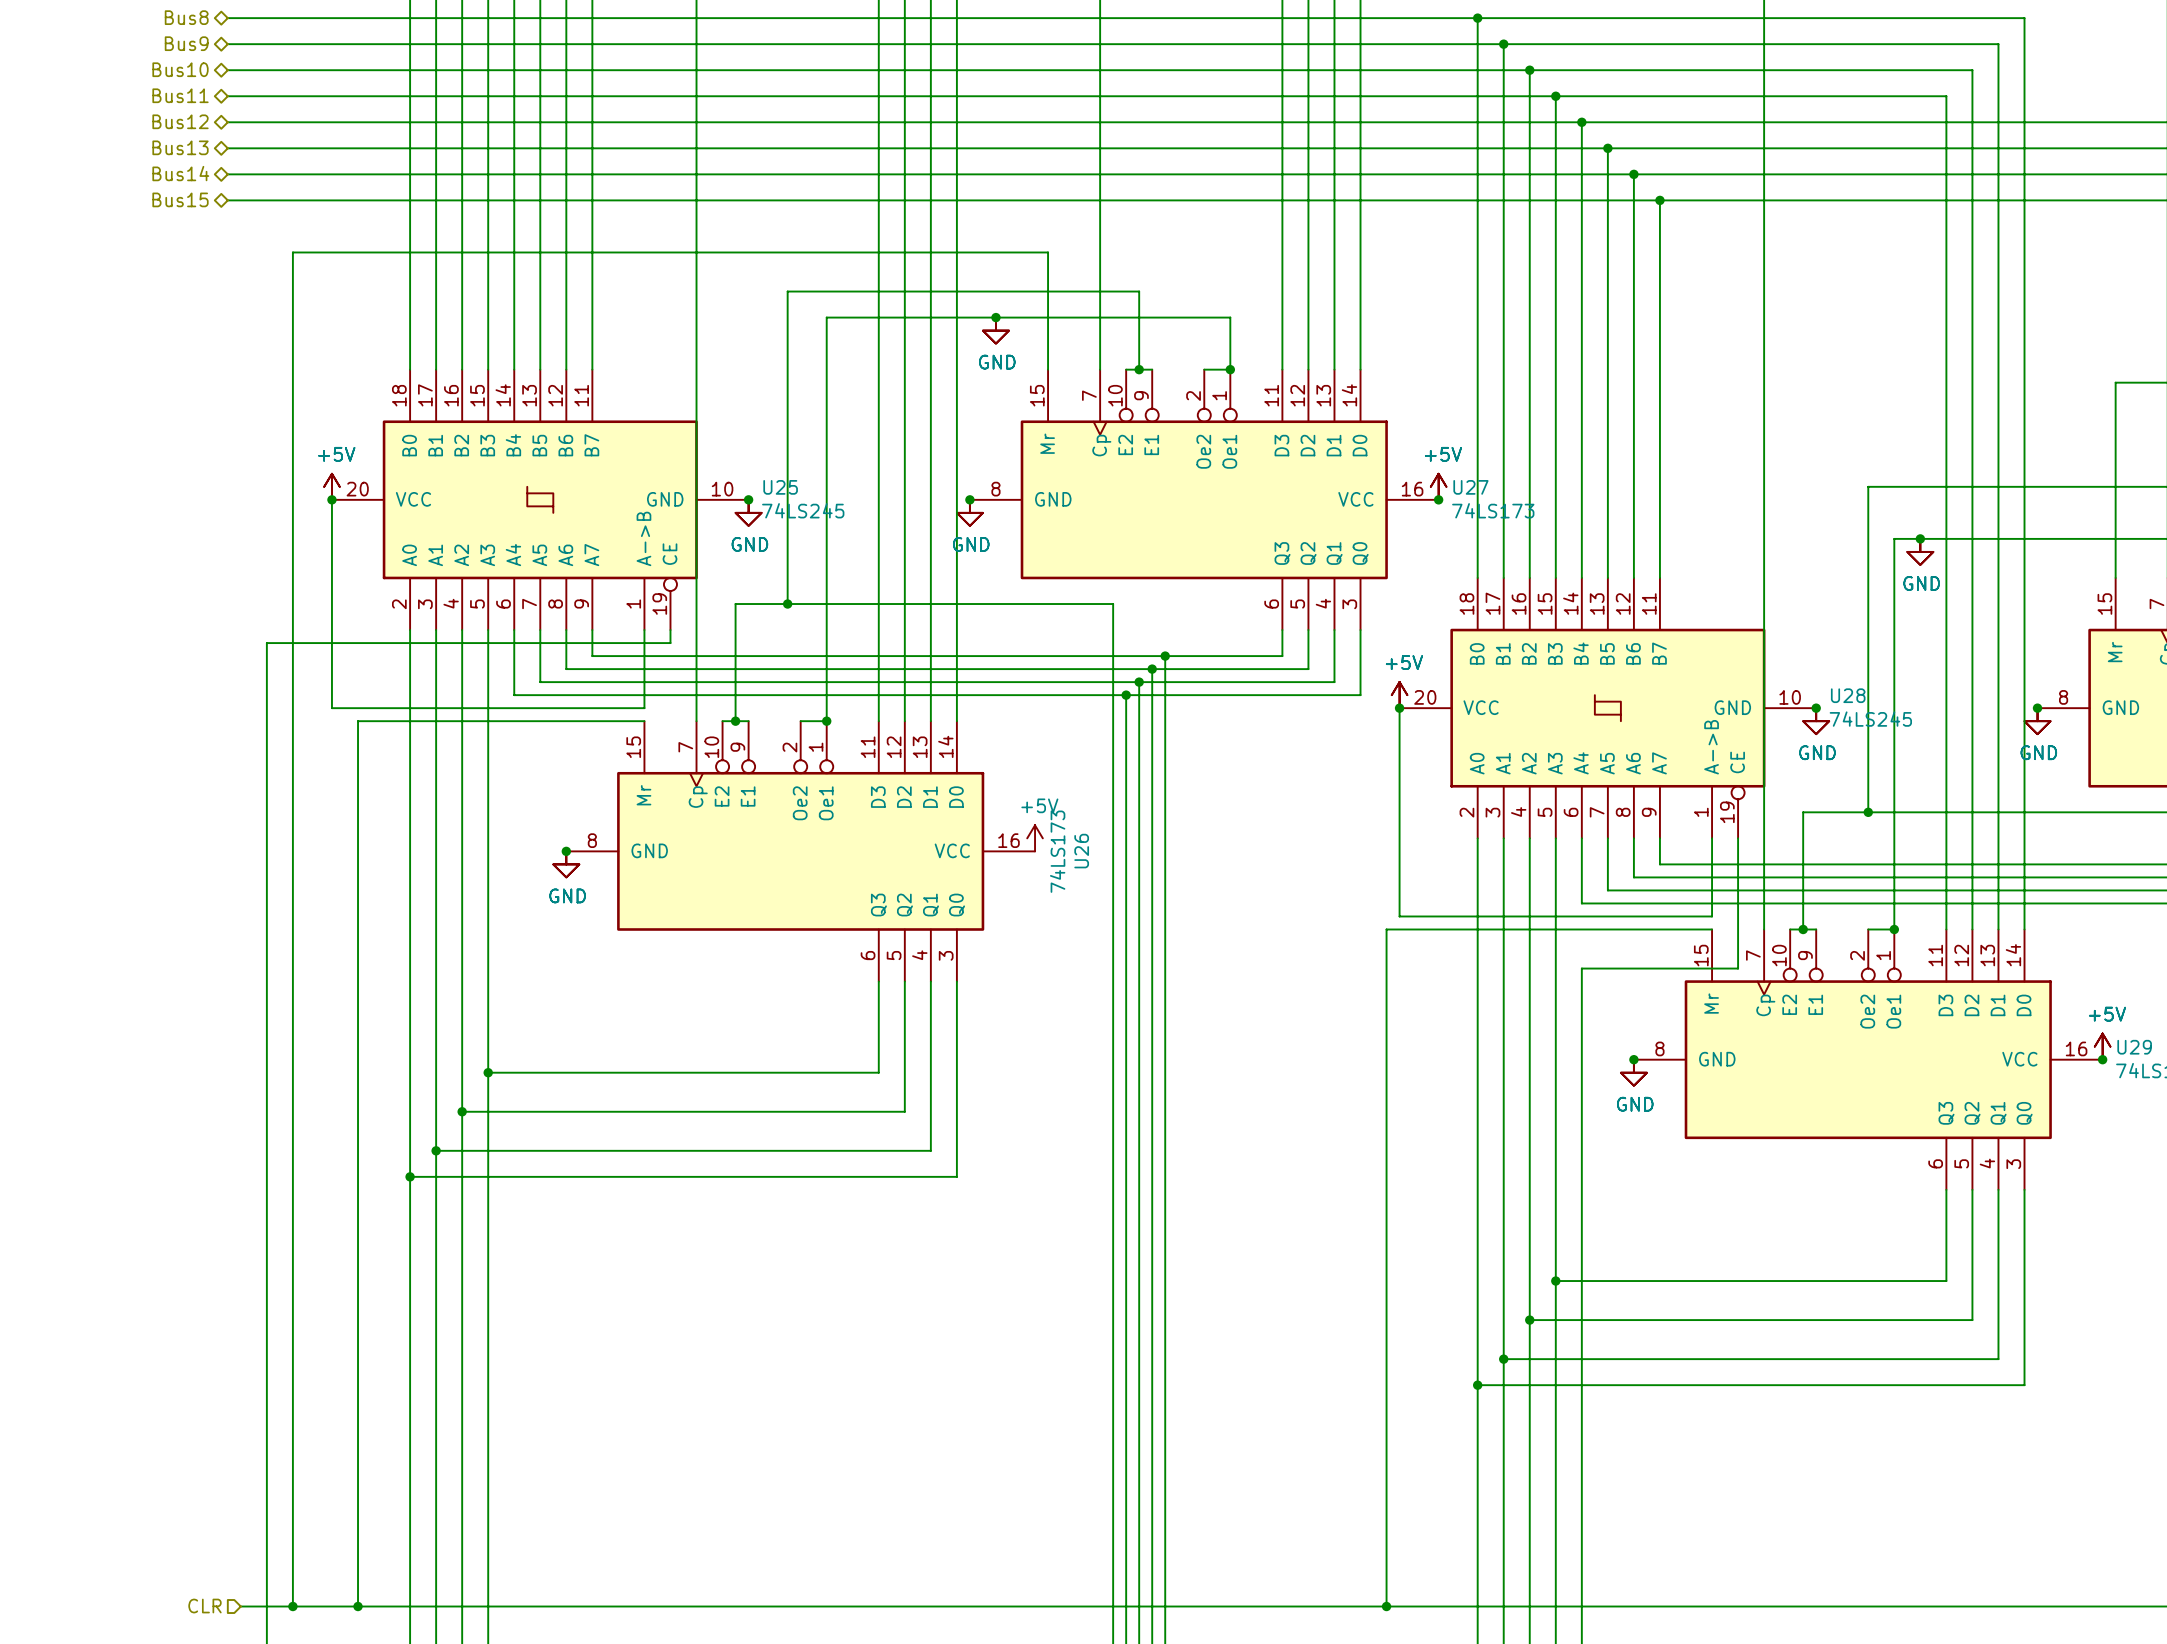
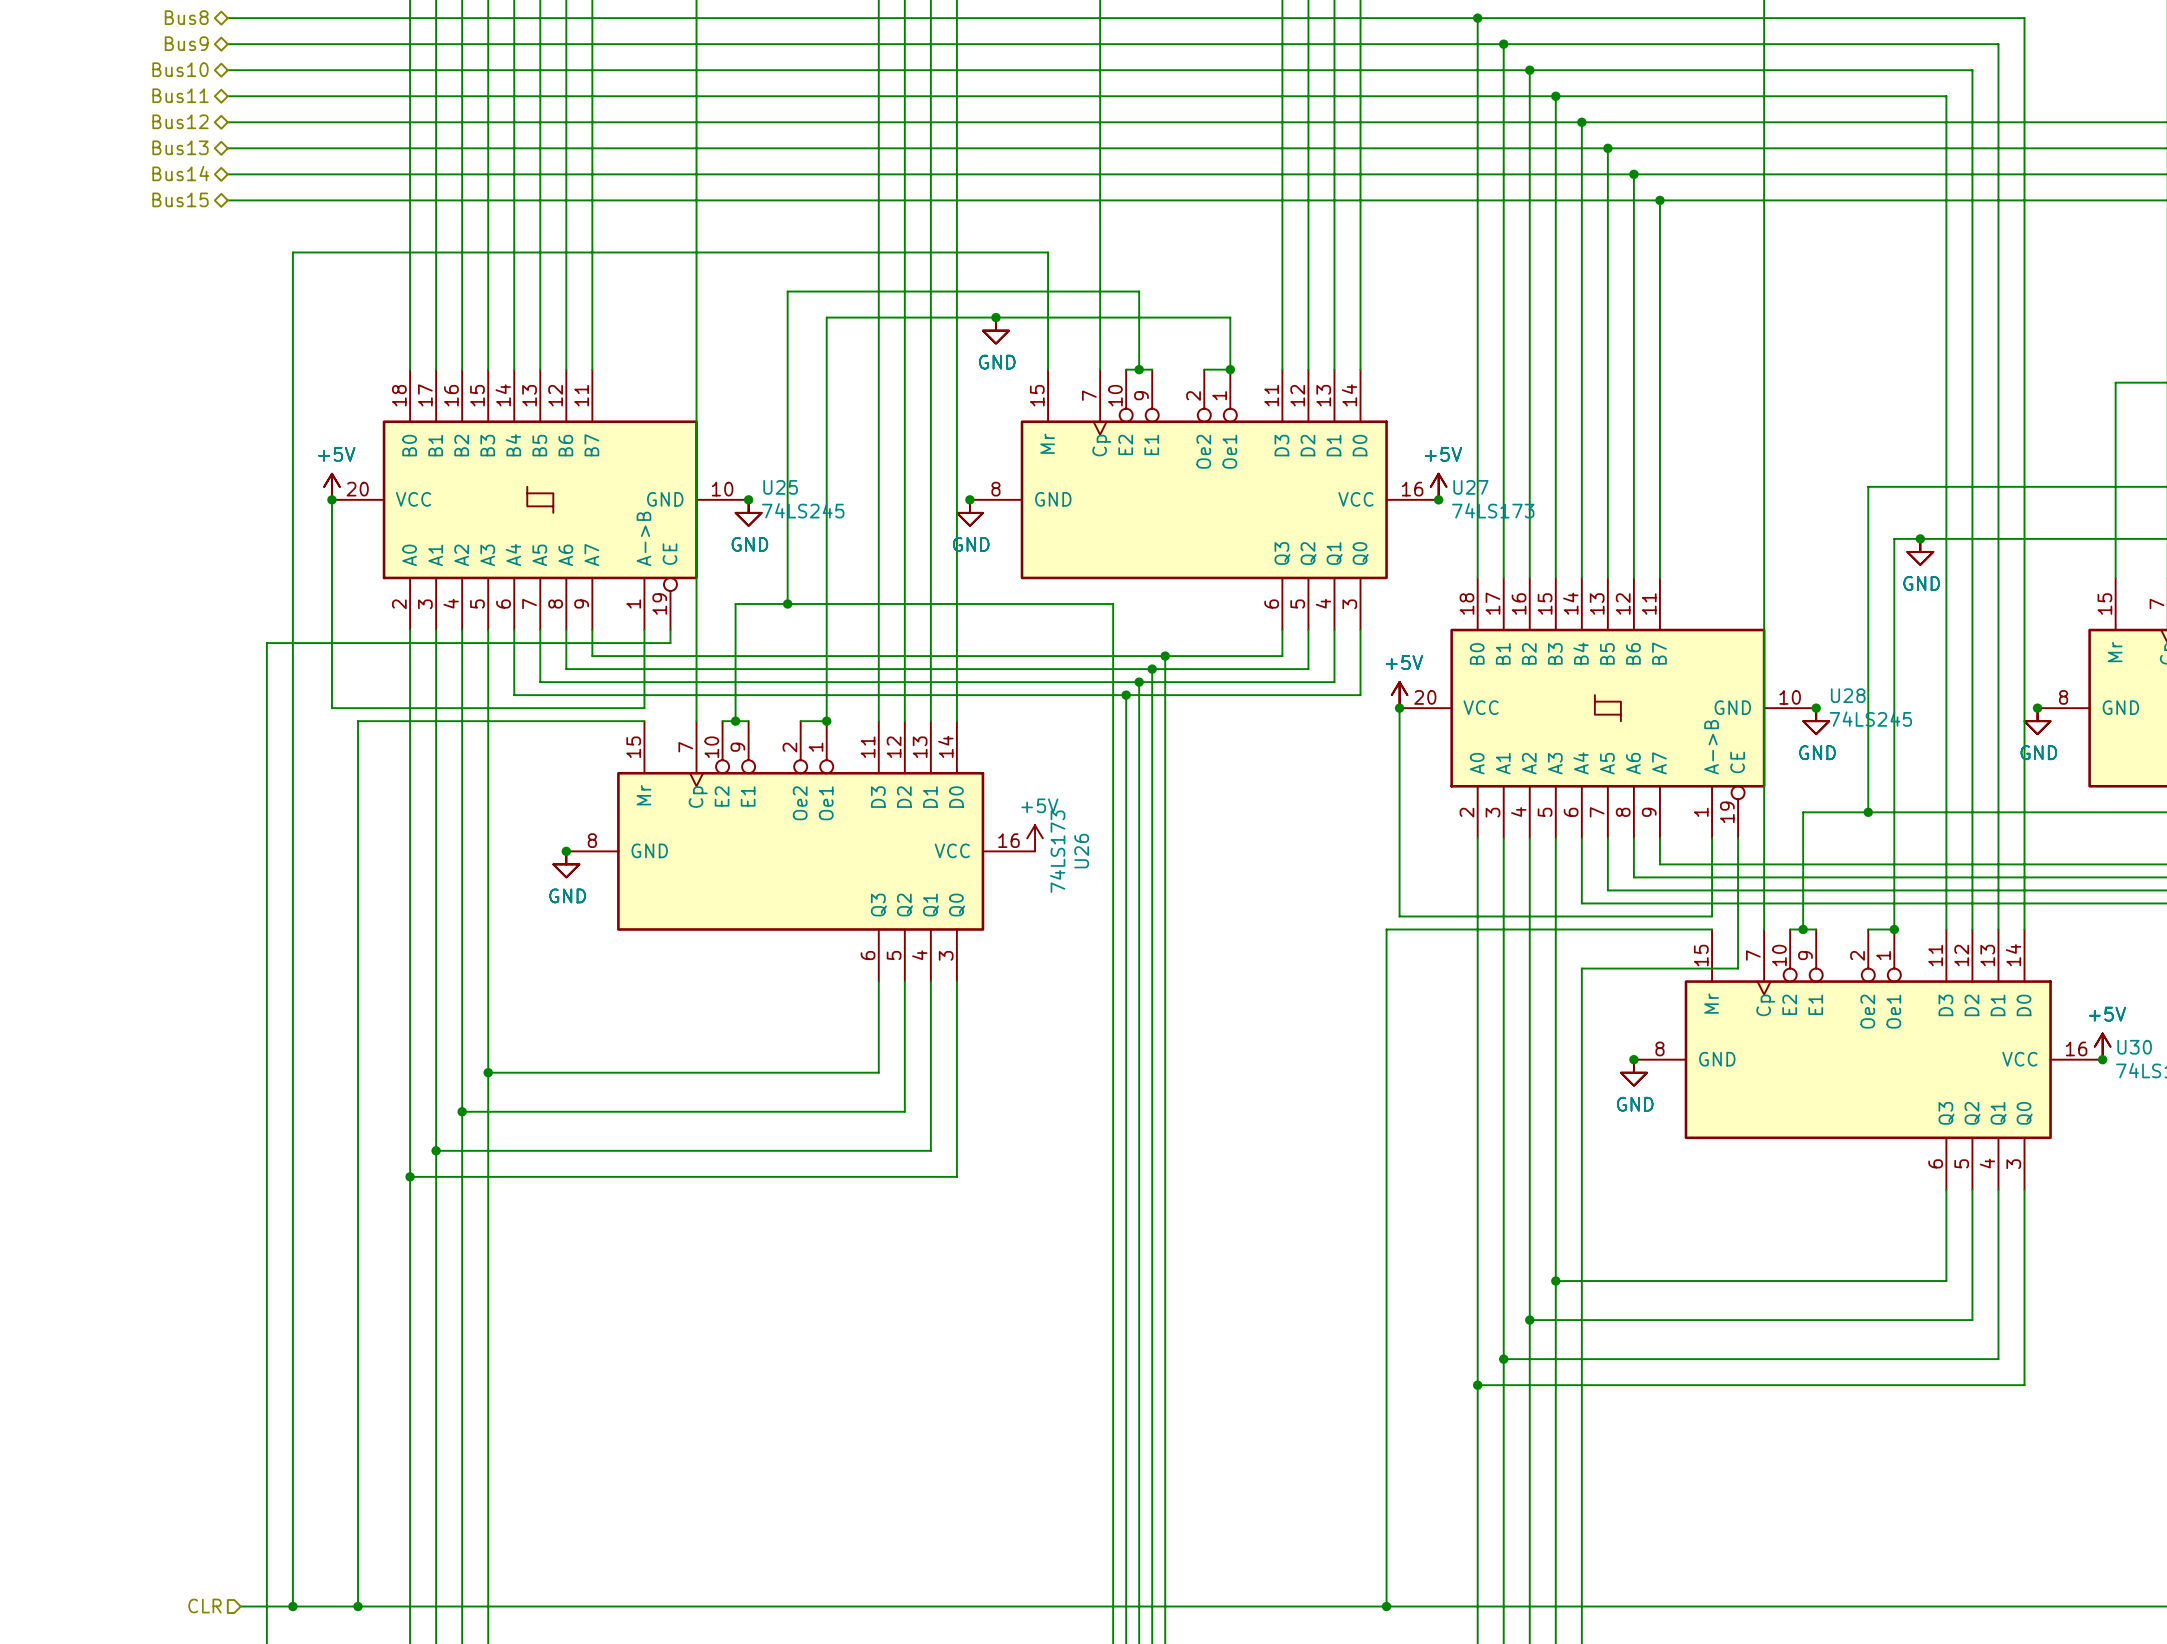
U29 name: U29 (2134, 1047) -> U30 (2134, 1047)

